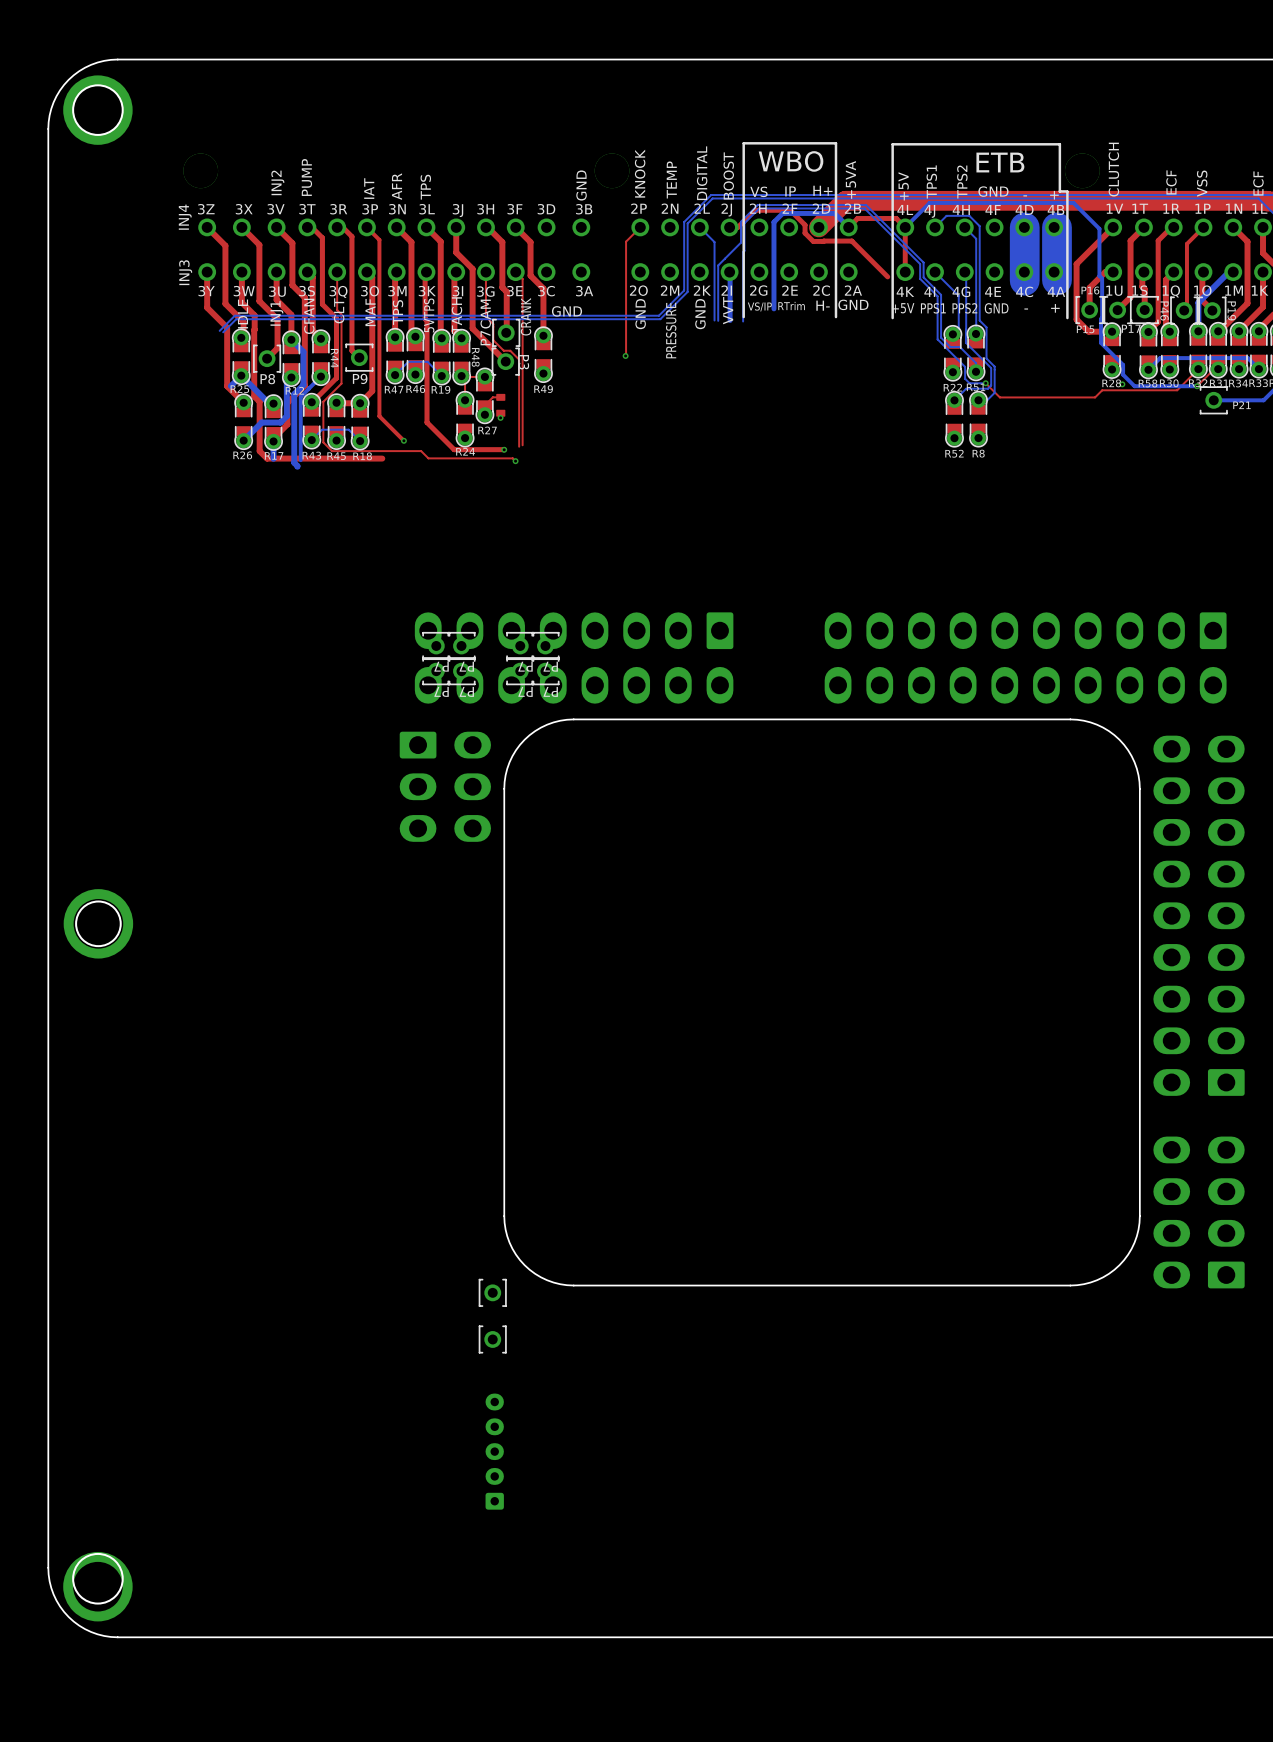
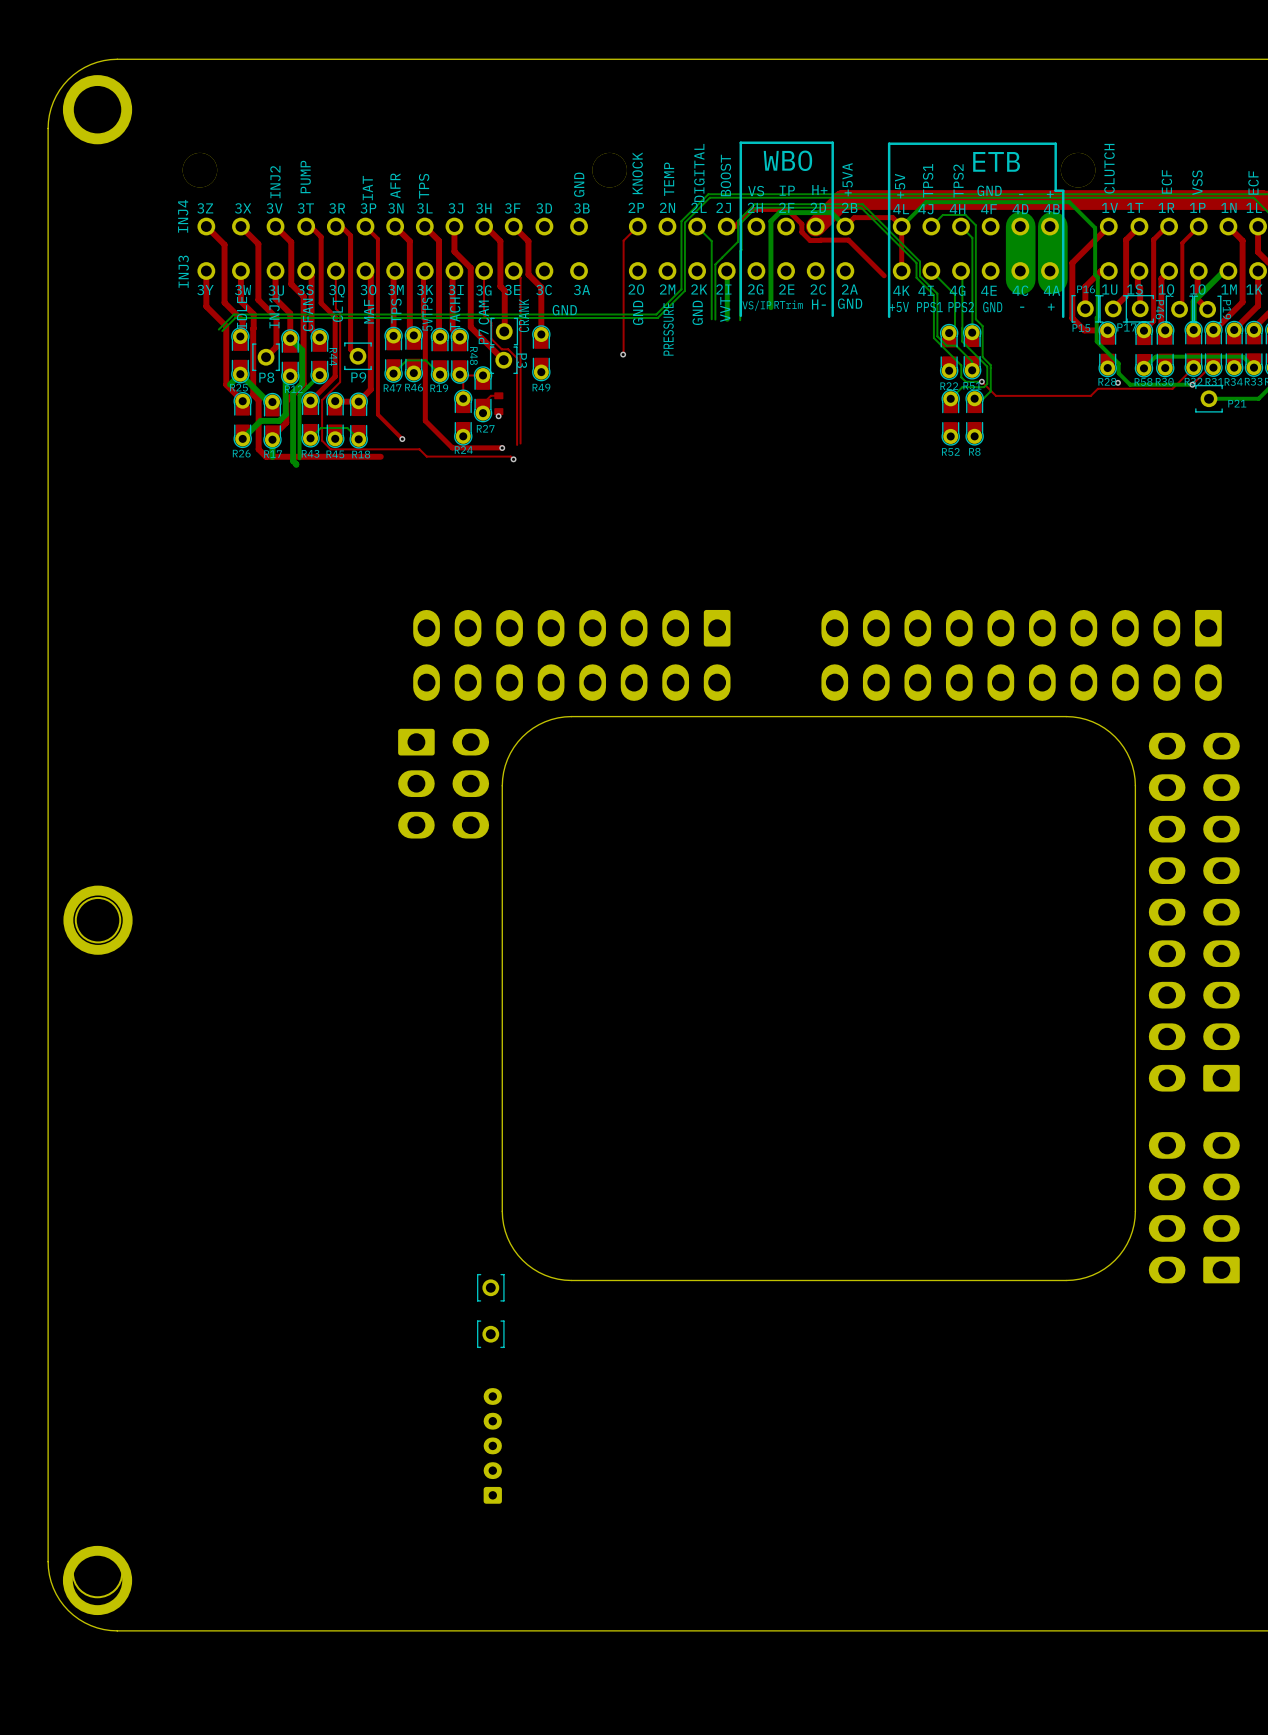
P7: (436, 645) -> none
P7: (461, 645) -> none
P7: (520, 645) -> none
P7: (545, 645) -> none
P7: (436, 671) -> none
P7: (461, 671) -> none
P7: (520, 671) -> none
P7: (545, 671) -> none

